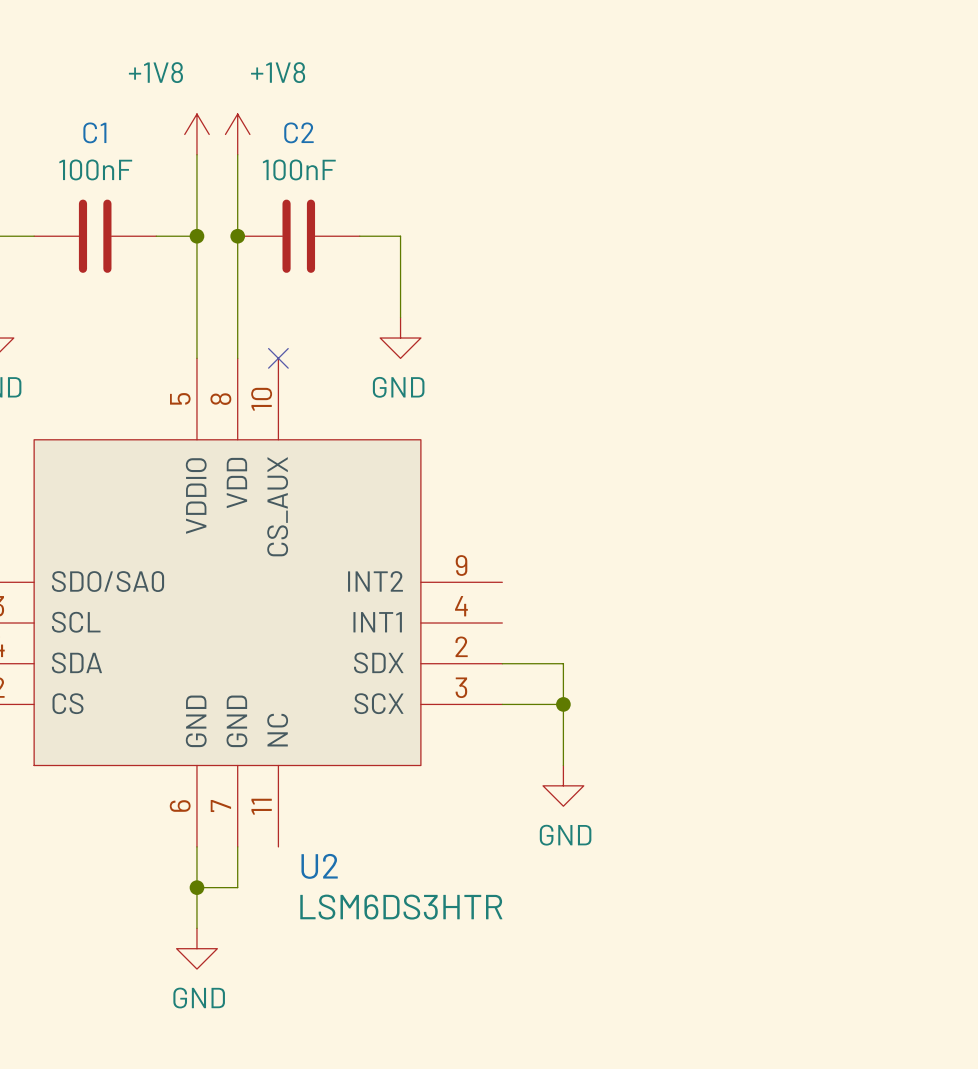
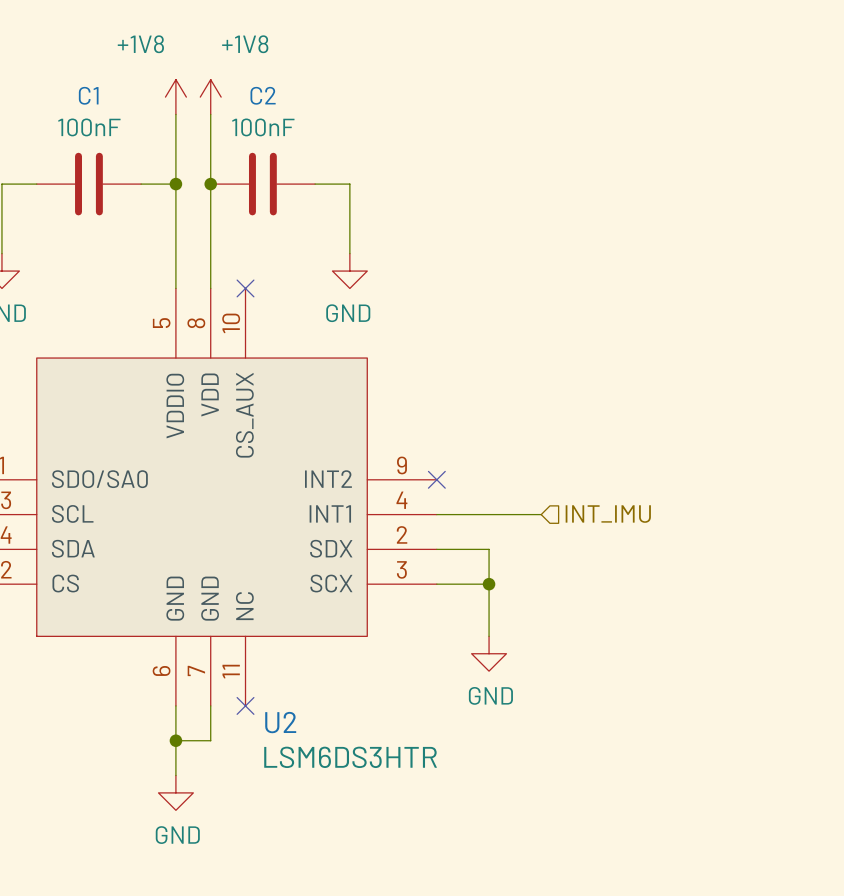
no-connect mark: none -> (436, 479)
hierarchical label: none -> INT_IMU (608, 514)
wire: none -> (436, 514) (541, 514)
no-connect mark: none -> (245, 705)

